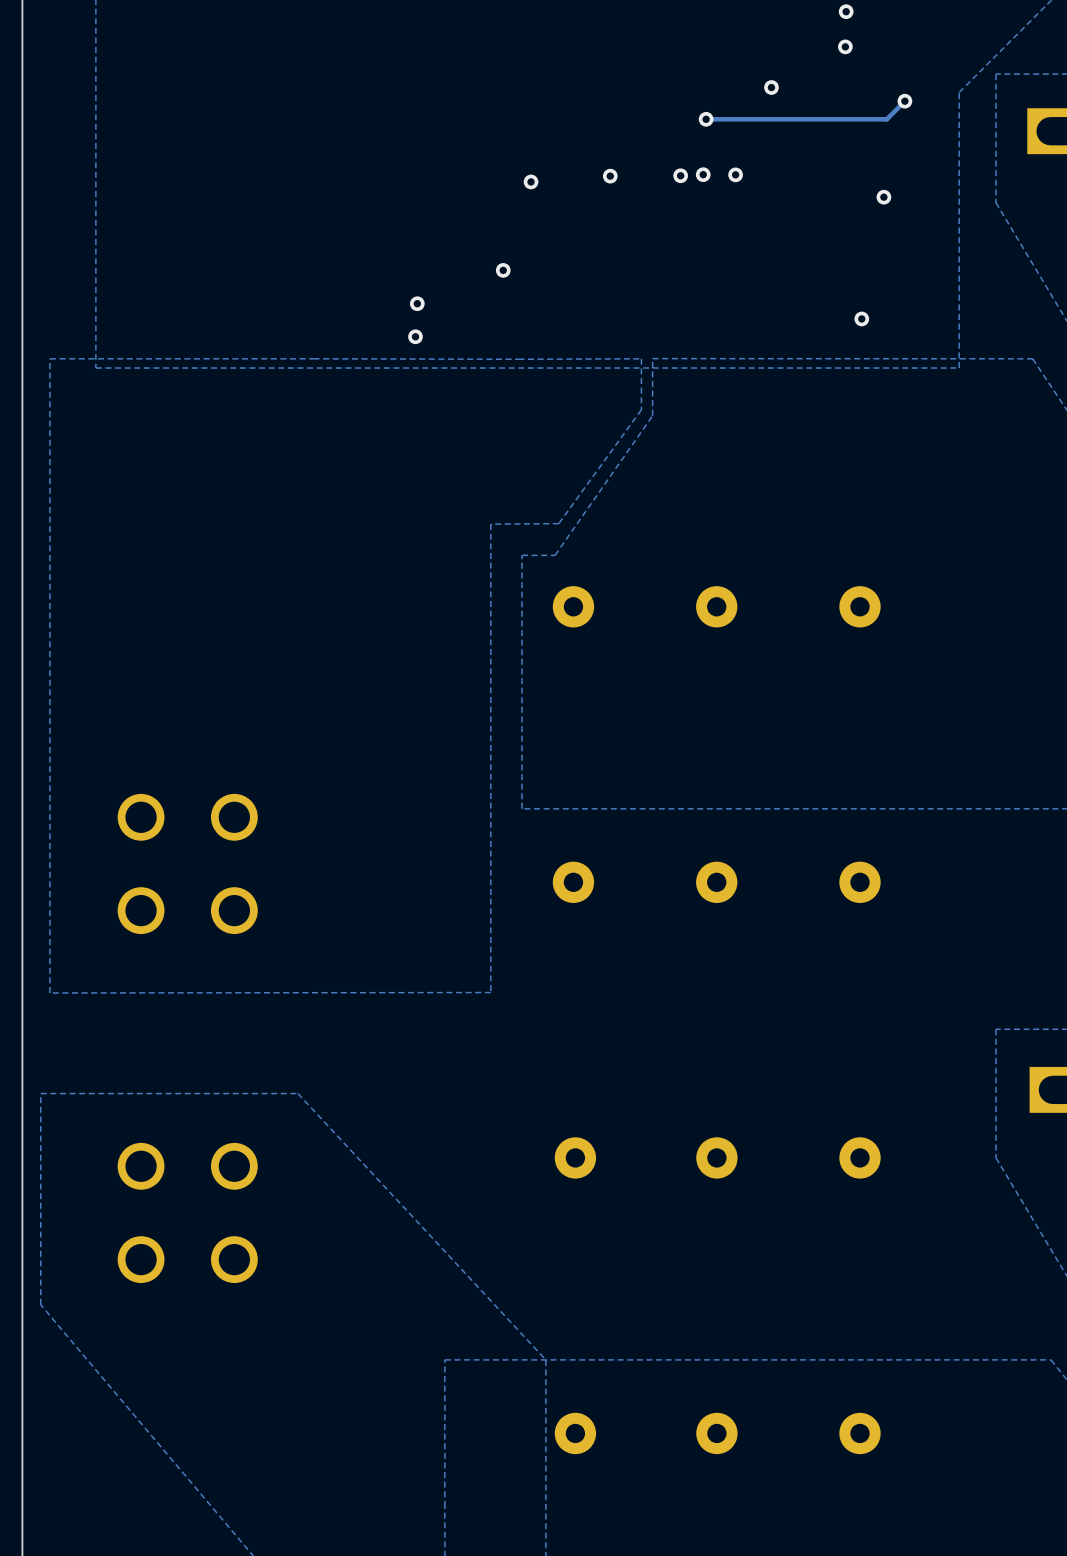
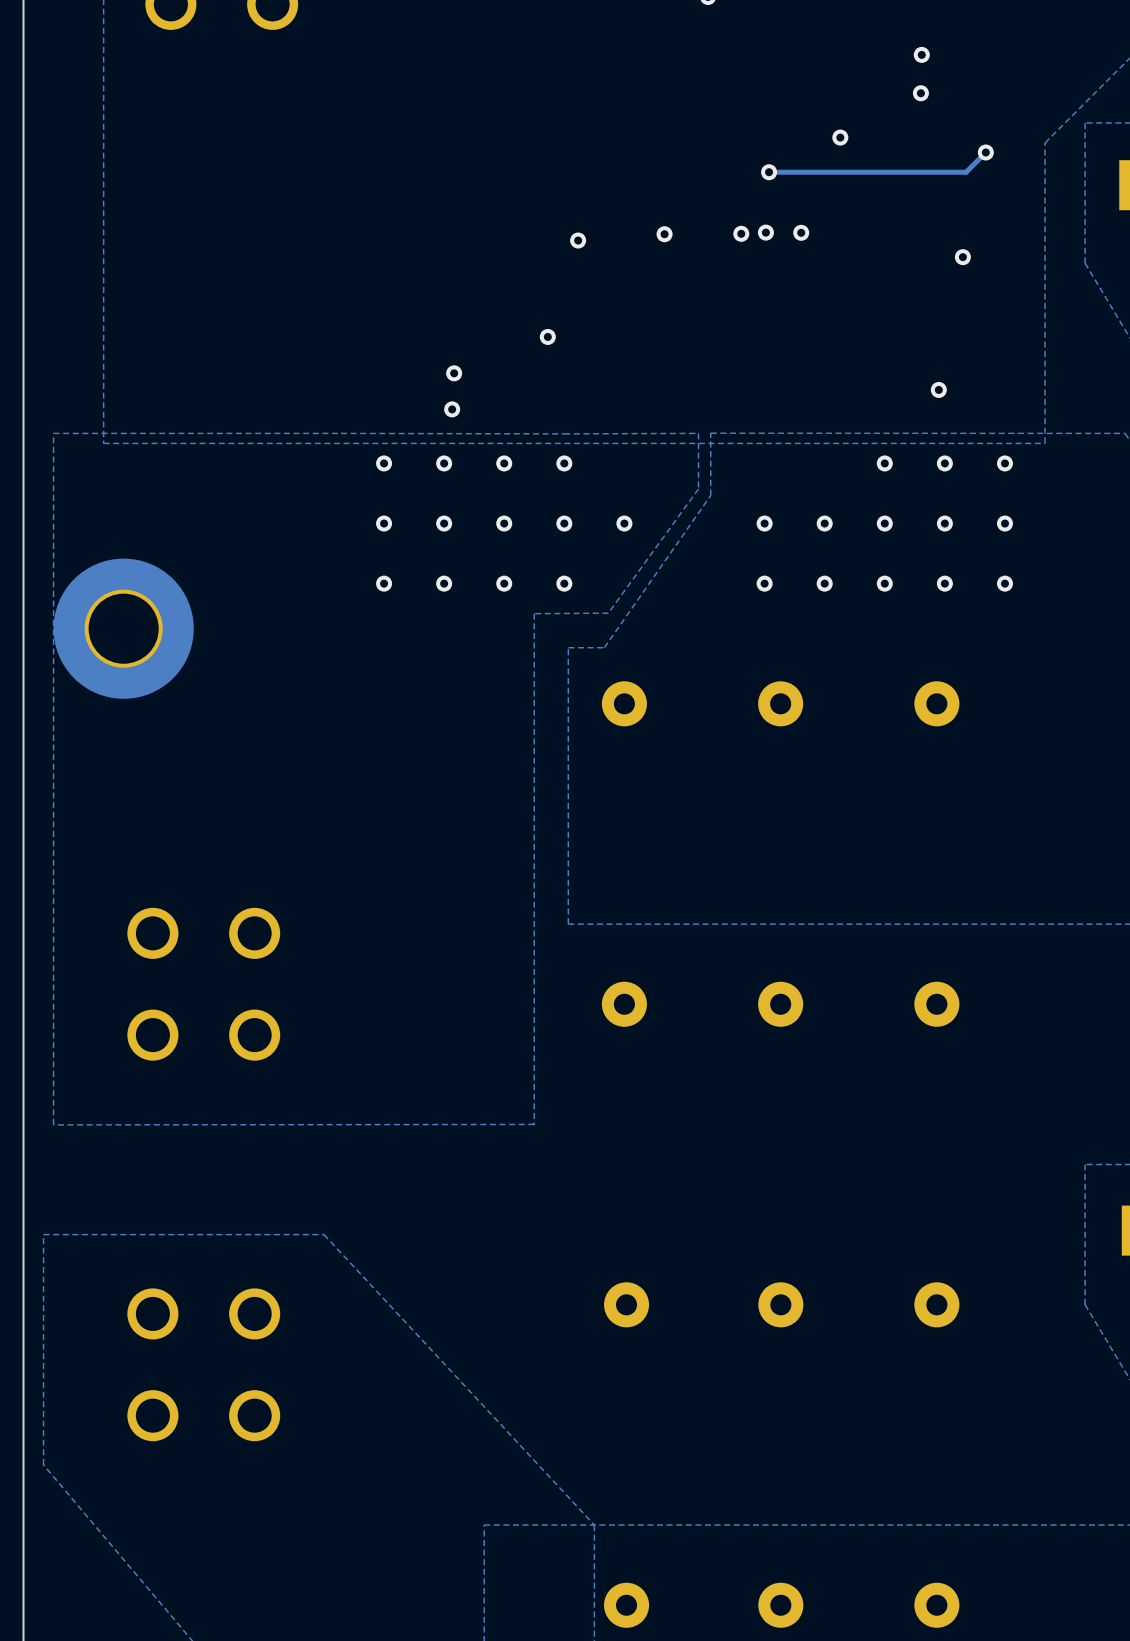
via: none -> (384, 463)
via: none -> (444, 463)
via: none -> (504, 463)
via: none -> (564, 463)
via: none -> (884, 463)
via: none -> (944, 463)
via: none -> (1004, 463)
via: none -> (384, 523)
via: none -> (444, 523)
via: none -> (504, 523)
via: none -> (564, 523)
via: none -> (624, 523)
via: none -> (764, 523)
via: none -> (824, 523)
via: none -> (884, 523)
via: none -> (944, 523)
via: none -> (1004, 523)
via: none -> (384, 583)
via: none -> (444, 583)
via: none -> (504, 583)
via: none -> (564, 583)
via: none -> (764, 583)
via: none -> (824, 583)
via: none -> (884, 583)
via: none -> (944, 583)
via: none -> (1004, 583)
part: none -> (123, 628)

